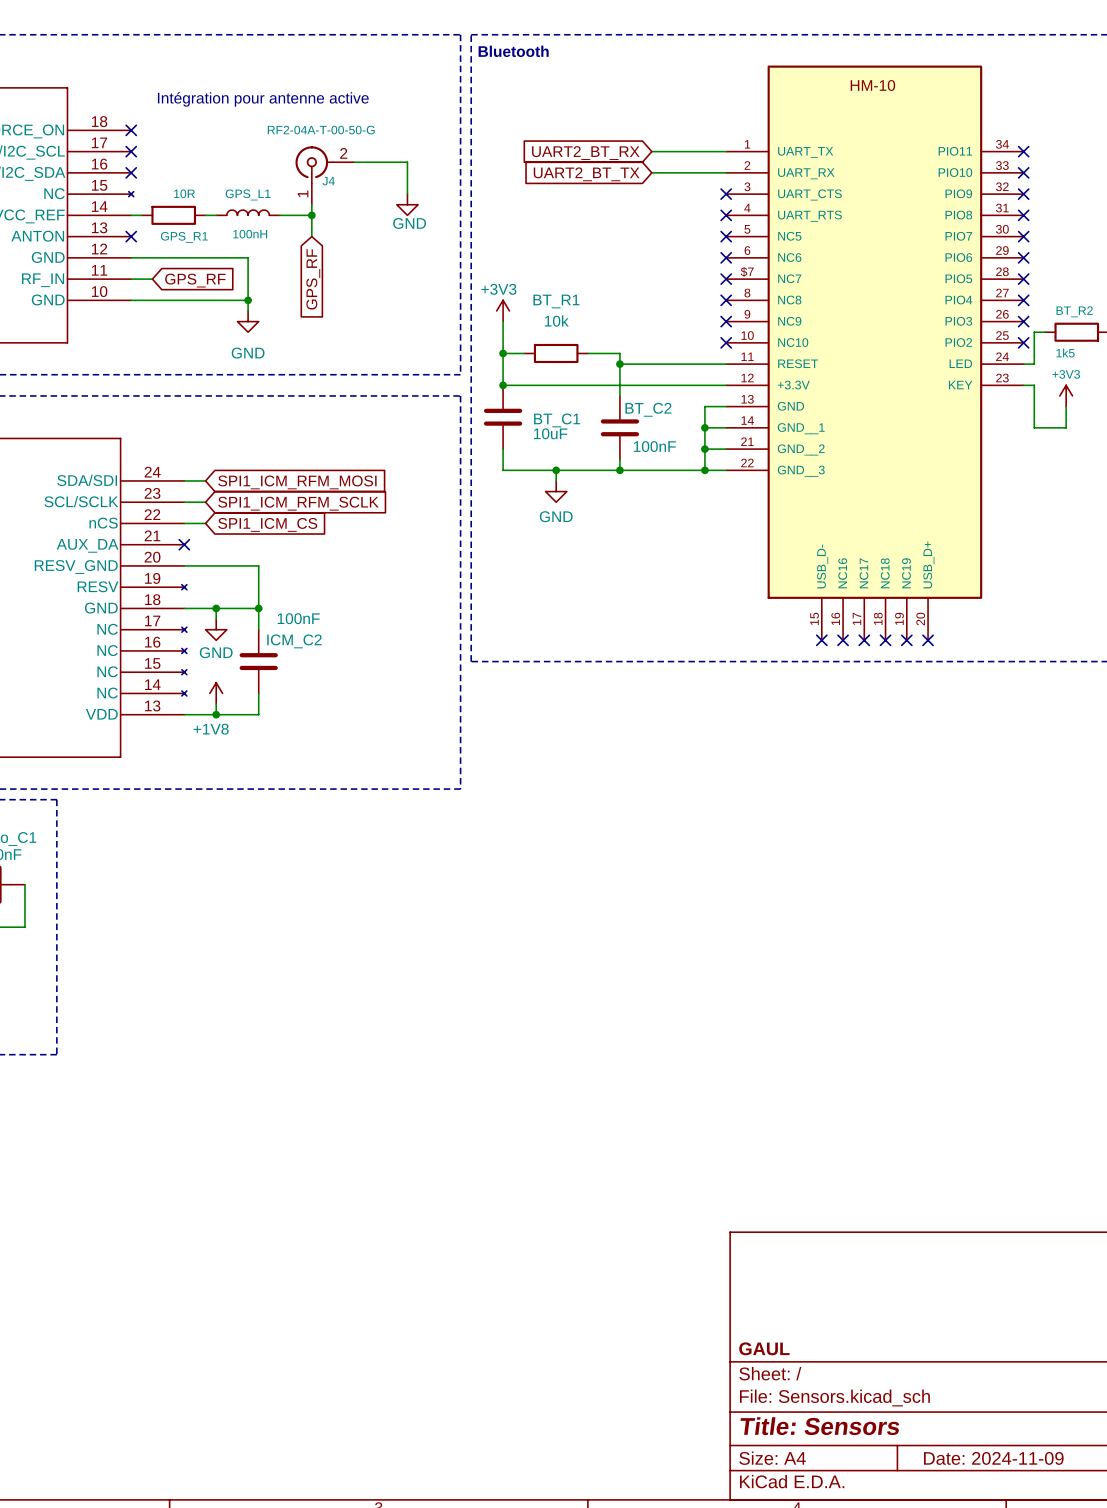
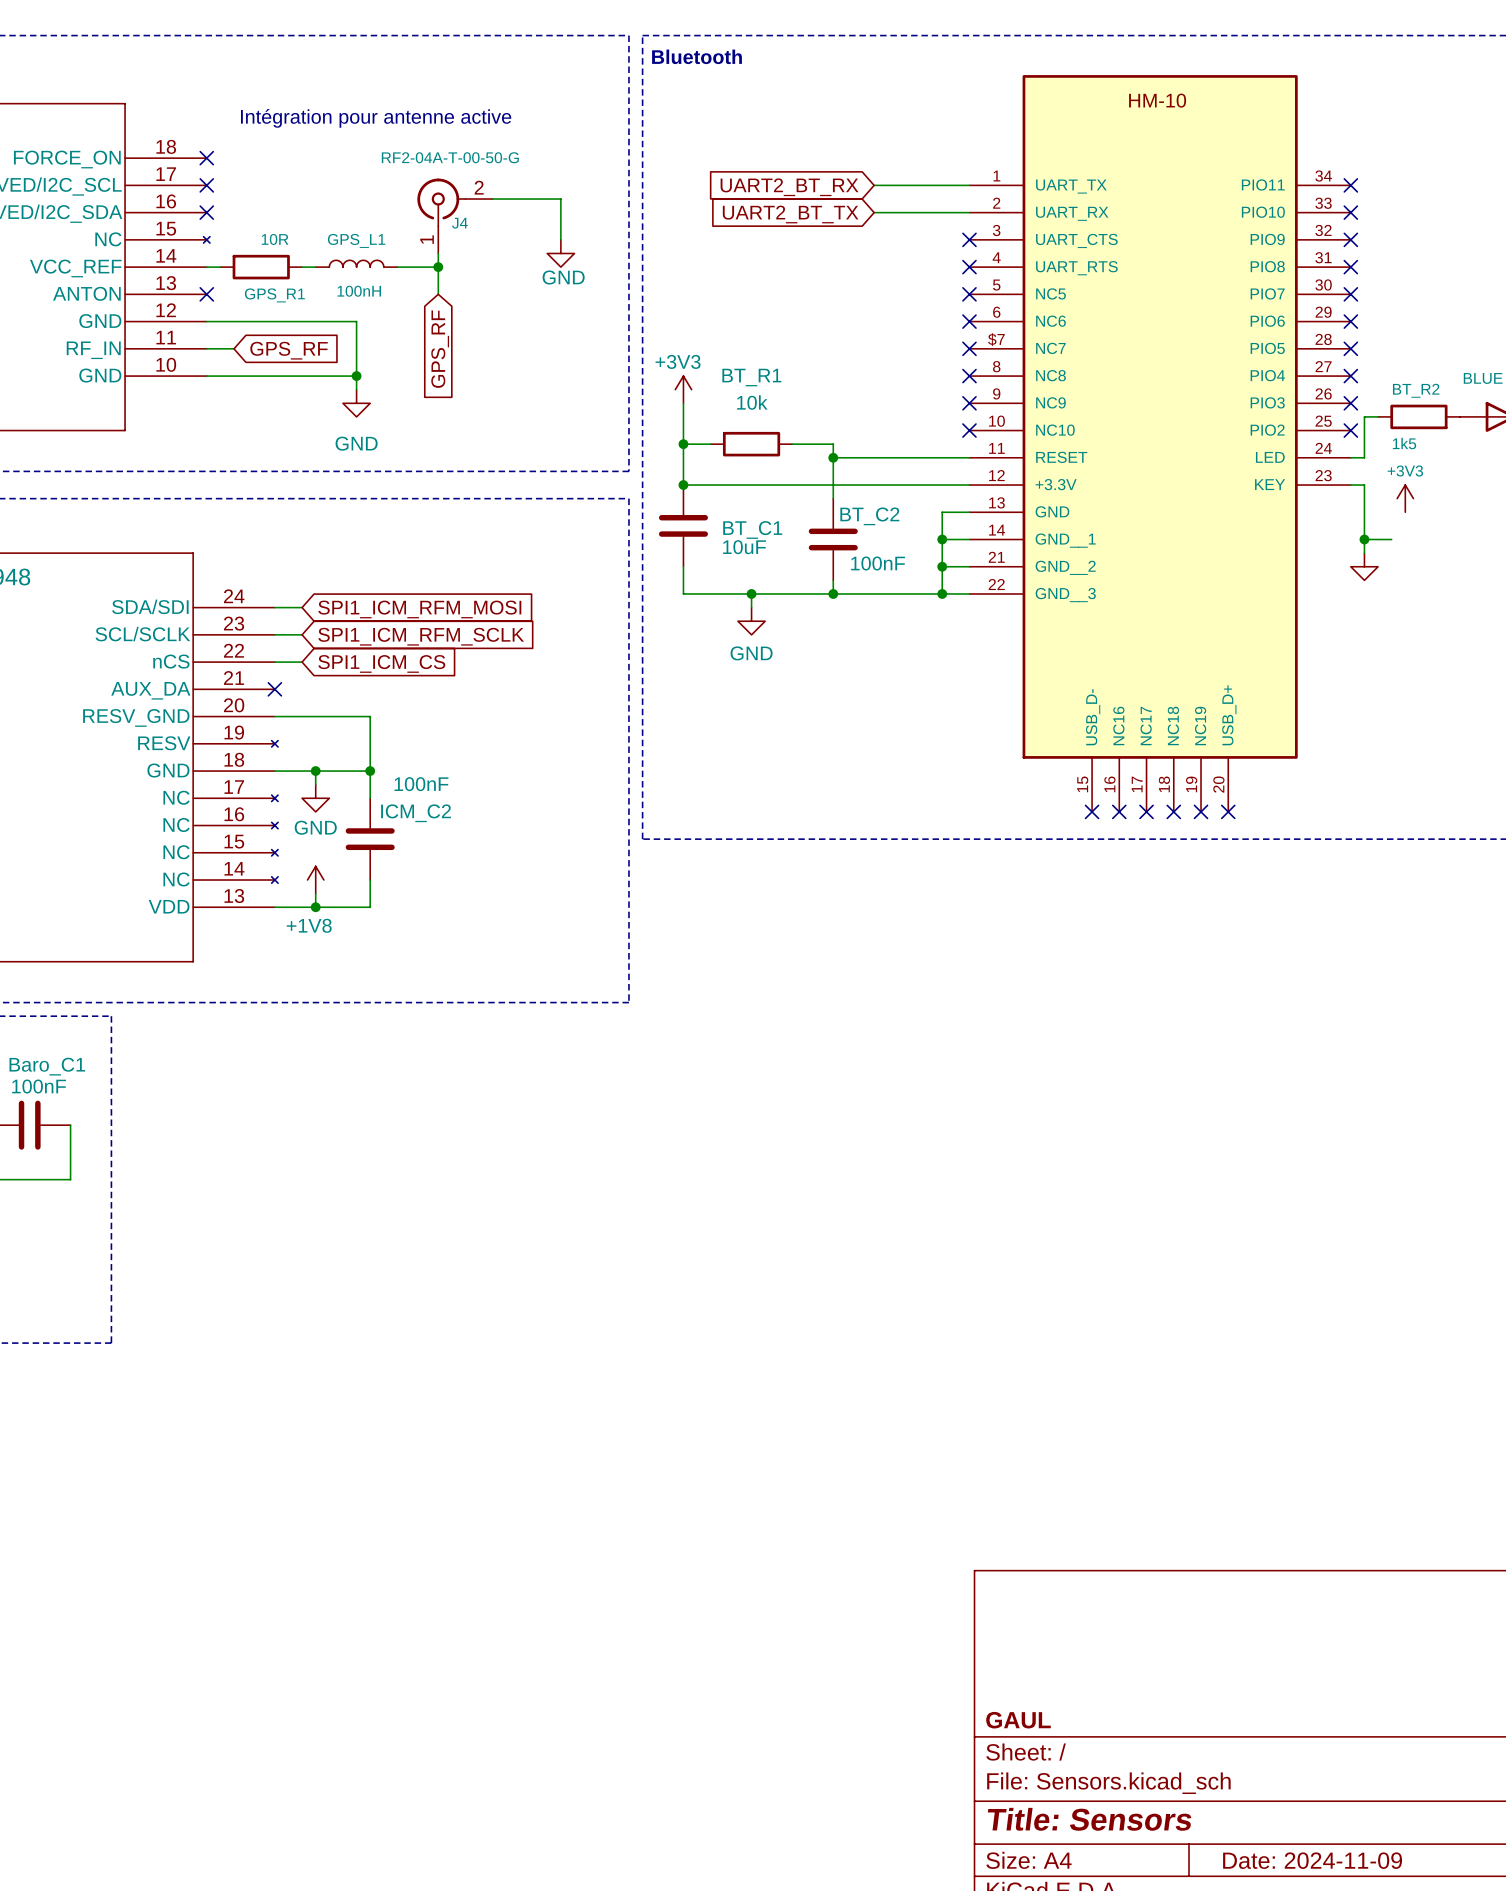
wire: (1066, 406) (1066, 427) (1055, 427) -> none
wire: none -> (1364, 539) (1364, 553)
junction: none -> (1364, 539)
power symbol: none -> (1364, 566)

